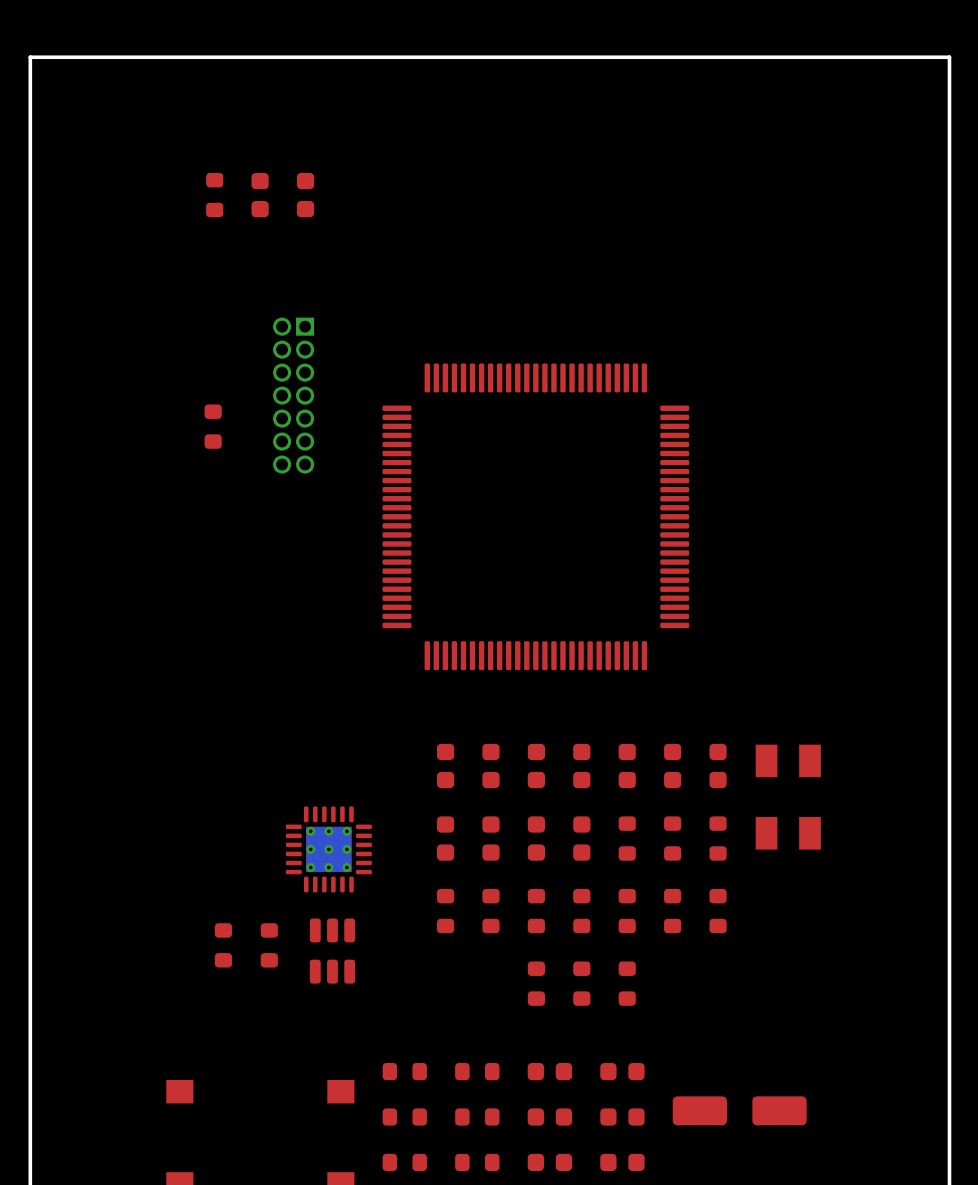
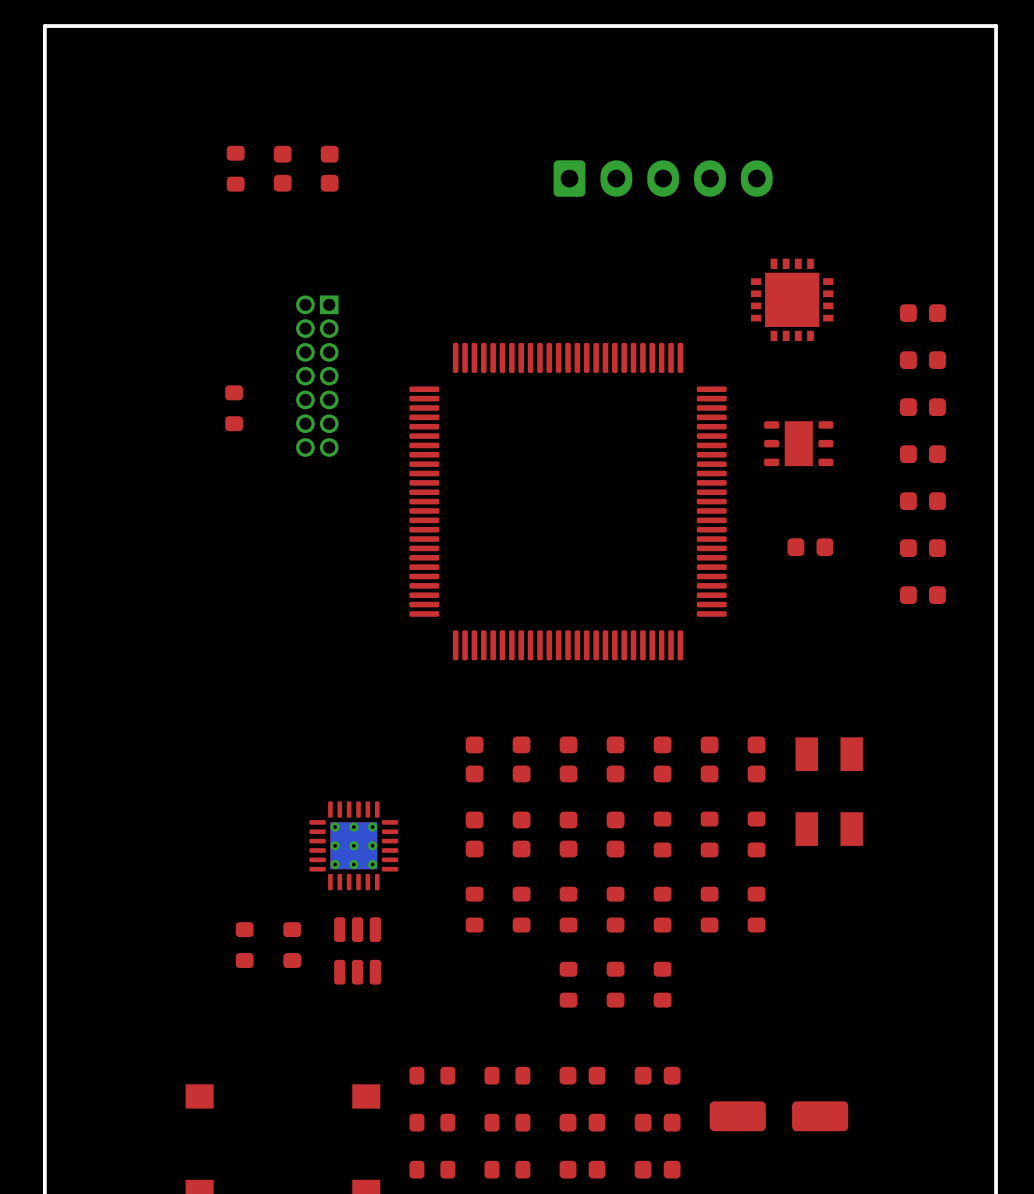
part: none -> (663, 178)
part: none -> (792, 299)
part: none -> (922, 313)
part: none -> (922, 360)
part: none -> (922, 407)
part: none -> (798, 443)
part: none -> (922, 454)
part: none -> (922, 501)
part: none -> (810, 547)
part: none -> (922, 548)
part: none -> (922, 595)

